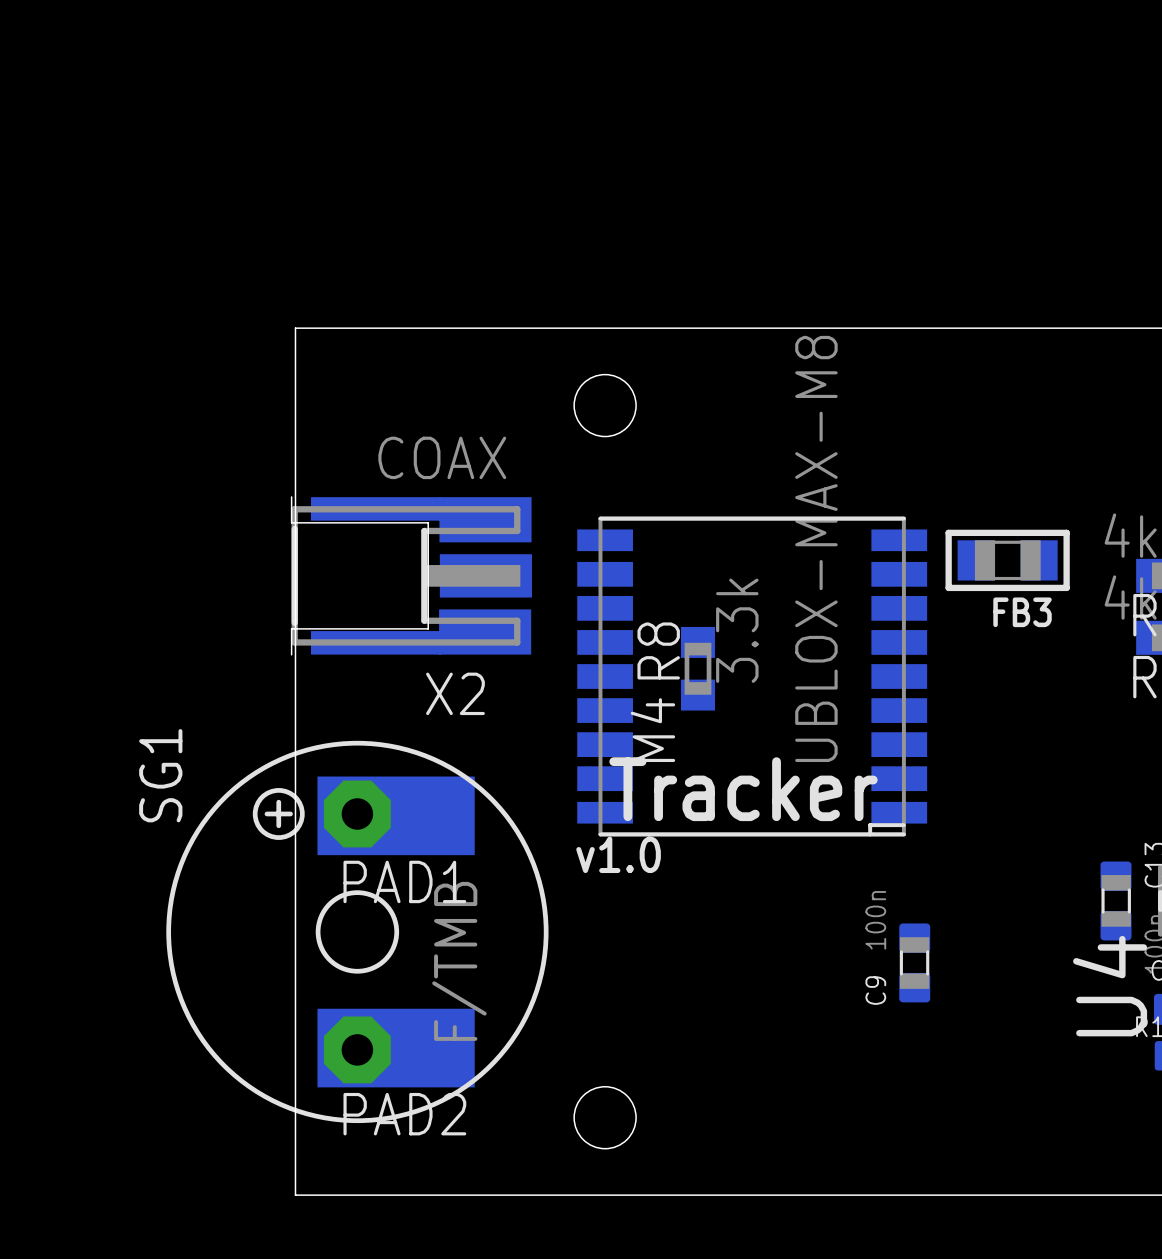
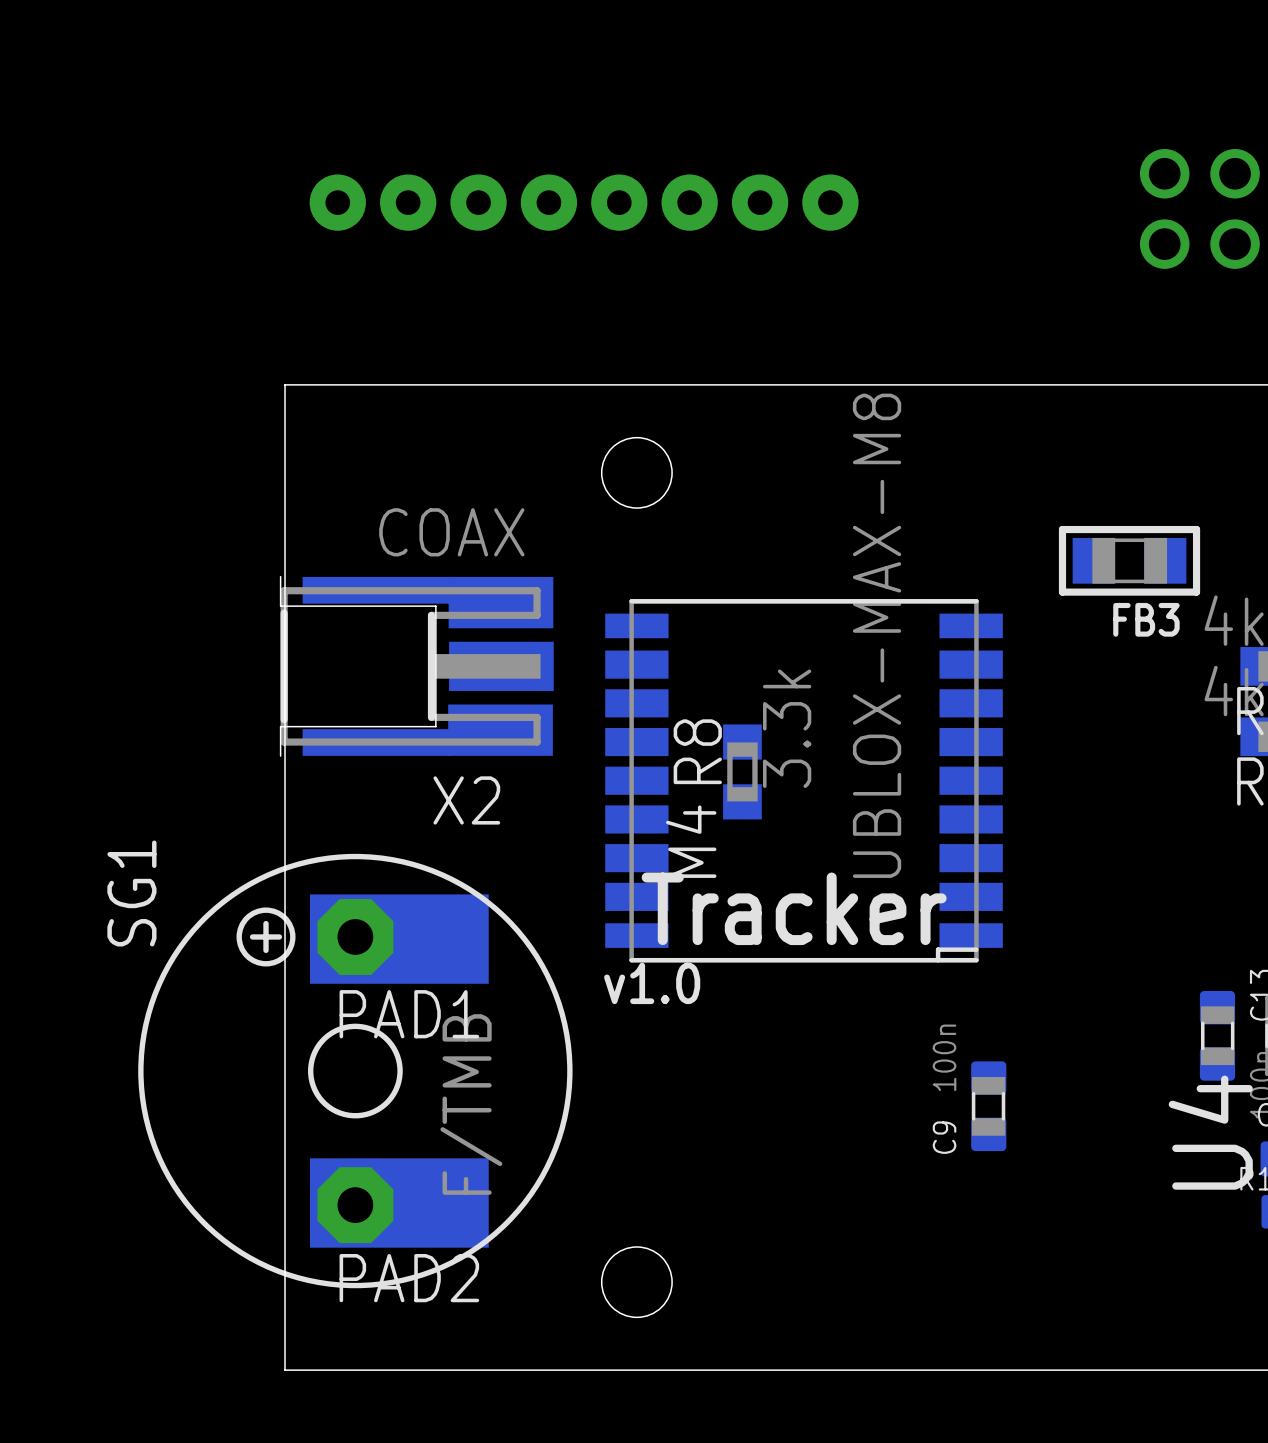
part: none -> (584, 202)
part: none -> (1199, 208)
FB3 position: (1007, 560) -> (1129, 560)

